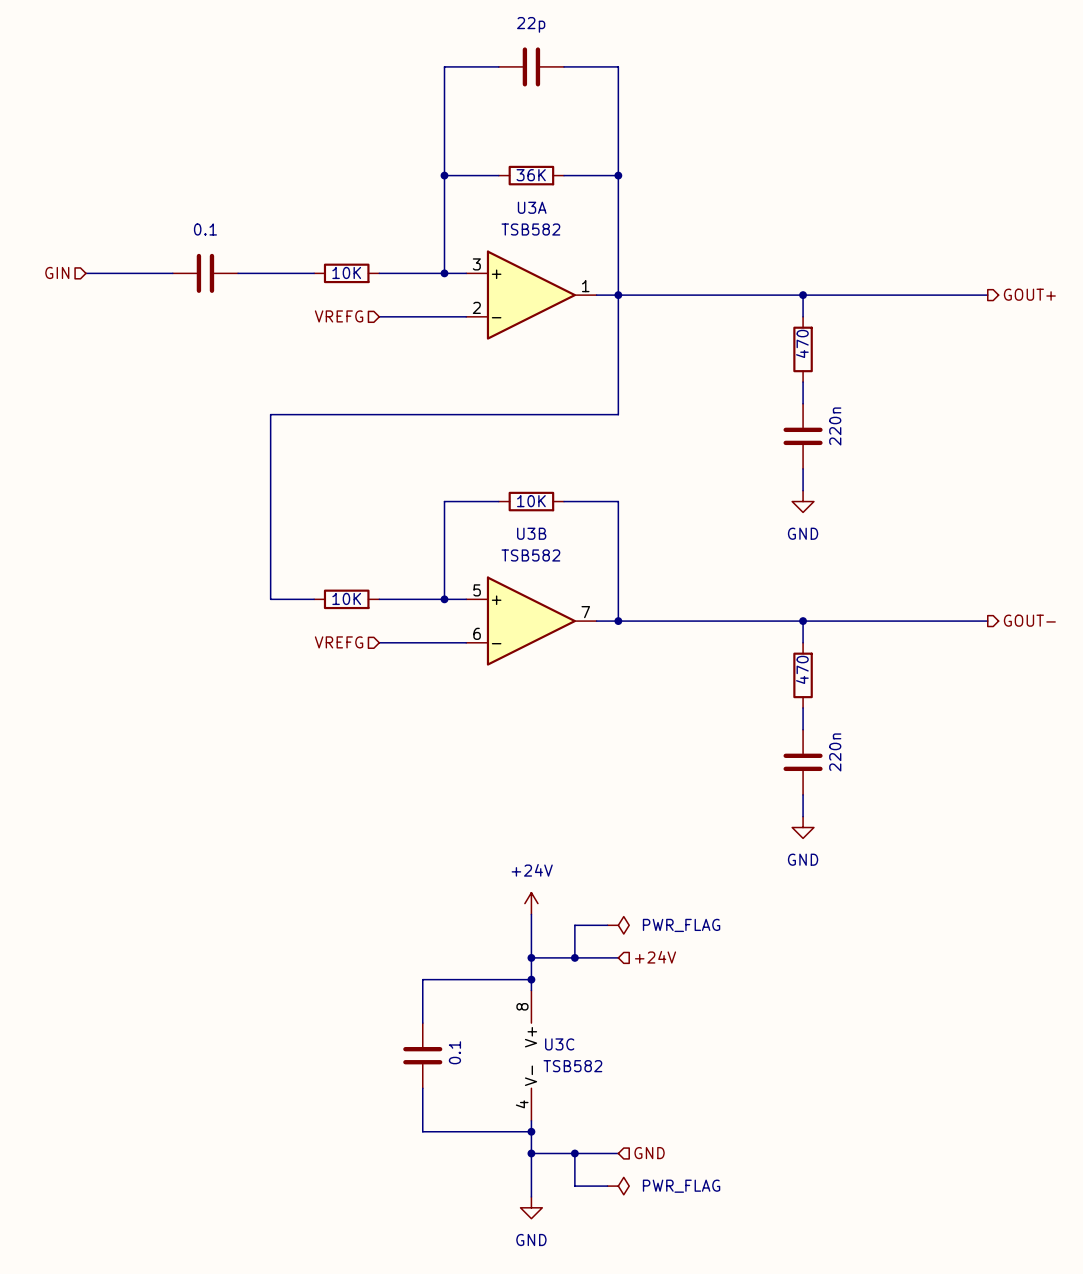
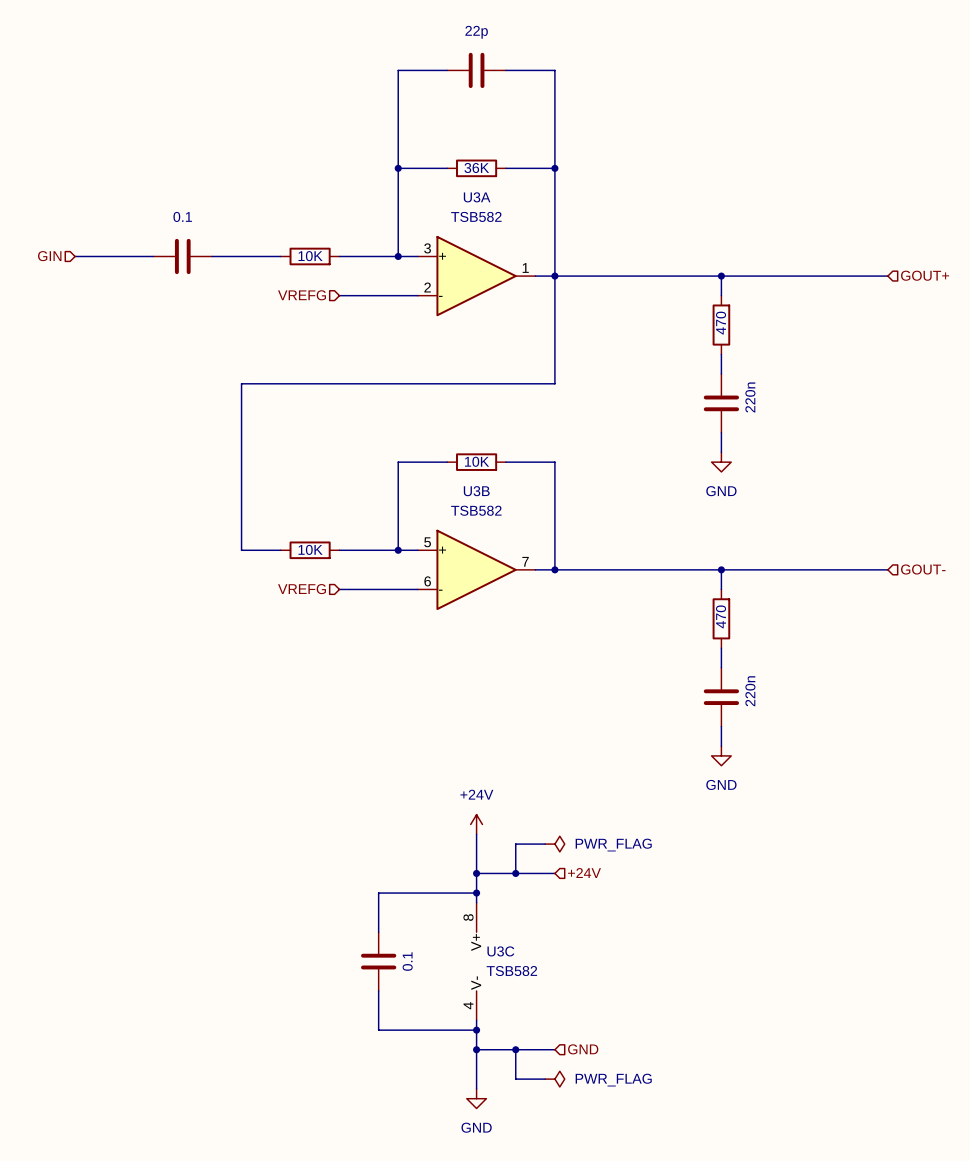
hierarchical label shape: output (1029, 294) -> input (925, 275)
hierarchical label shape: output (1029, 620) -> input (923, 569)

